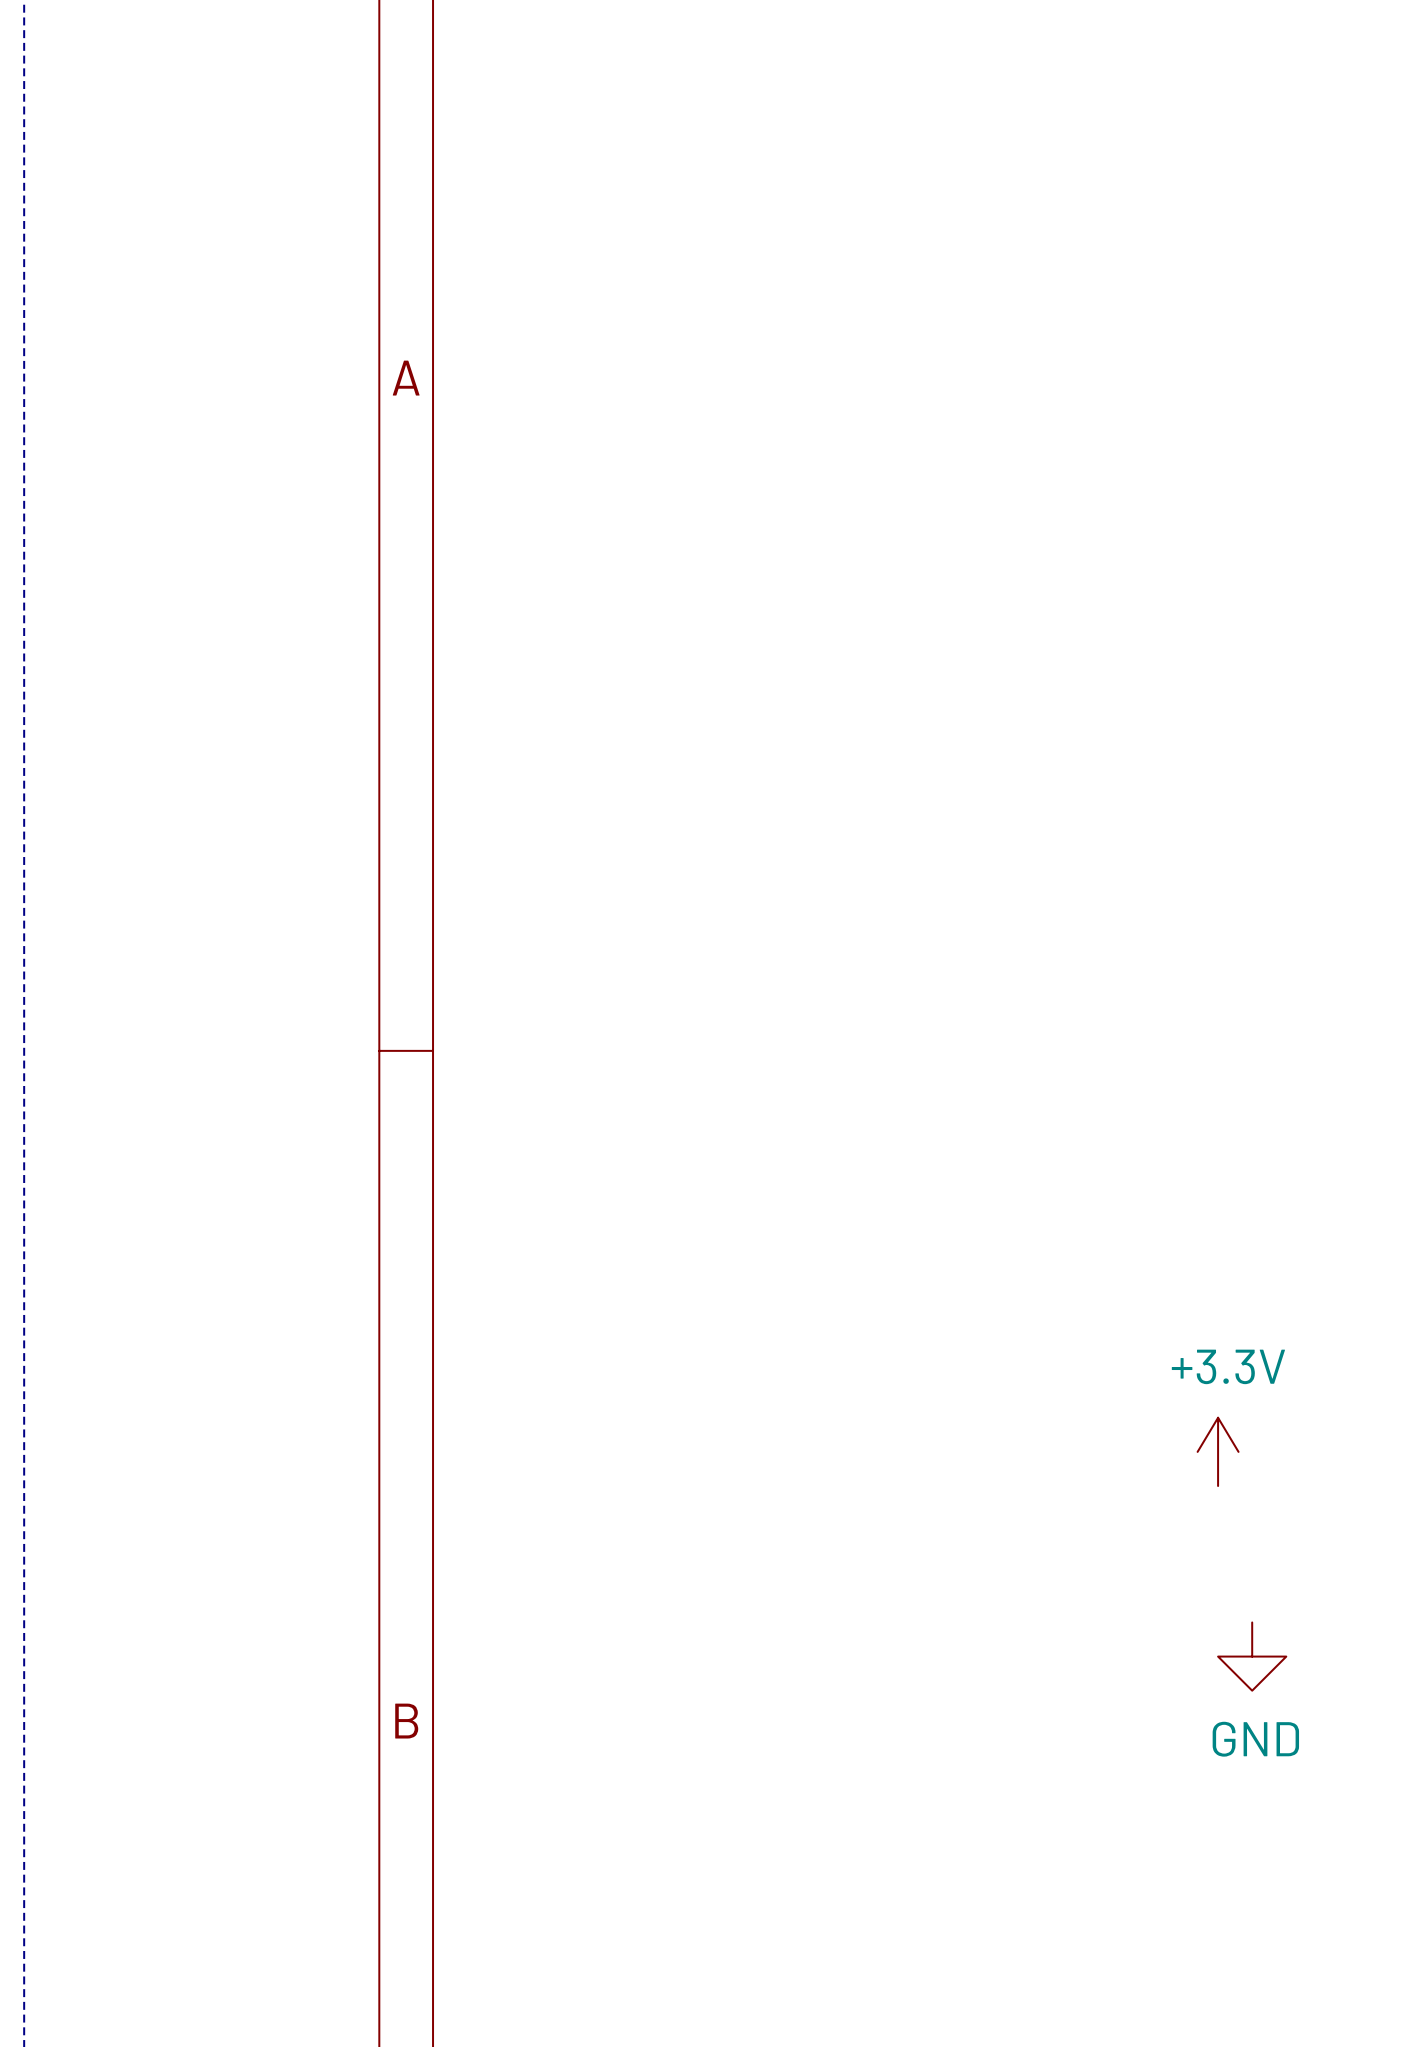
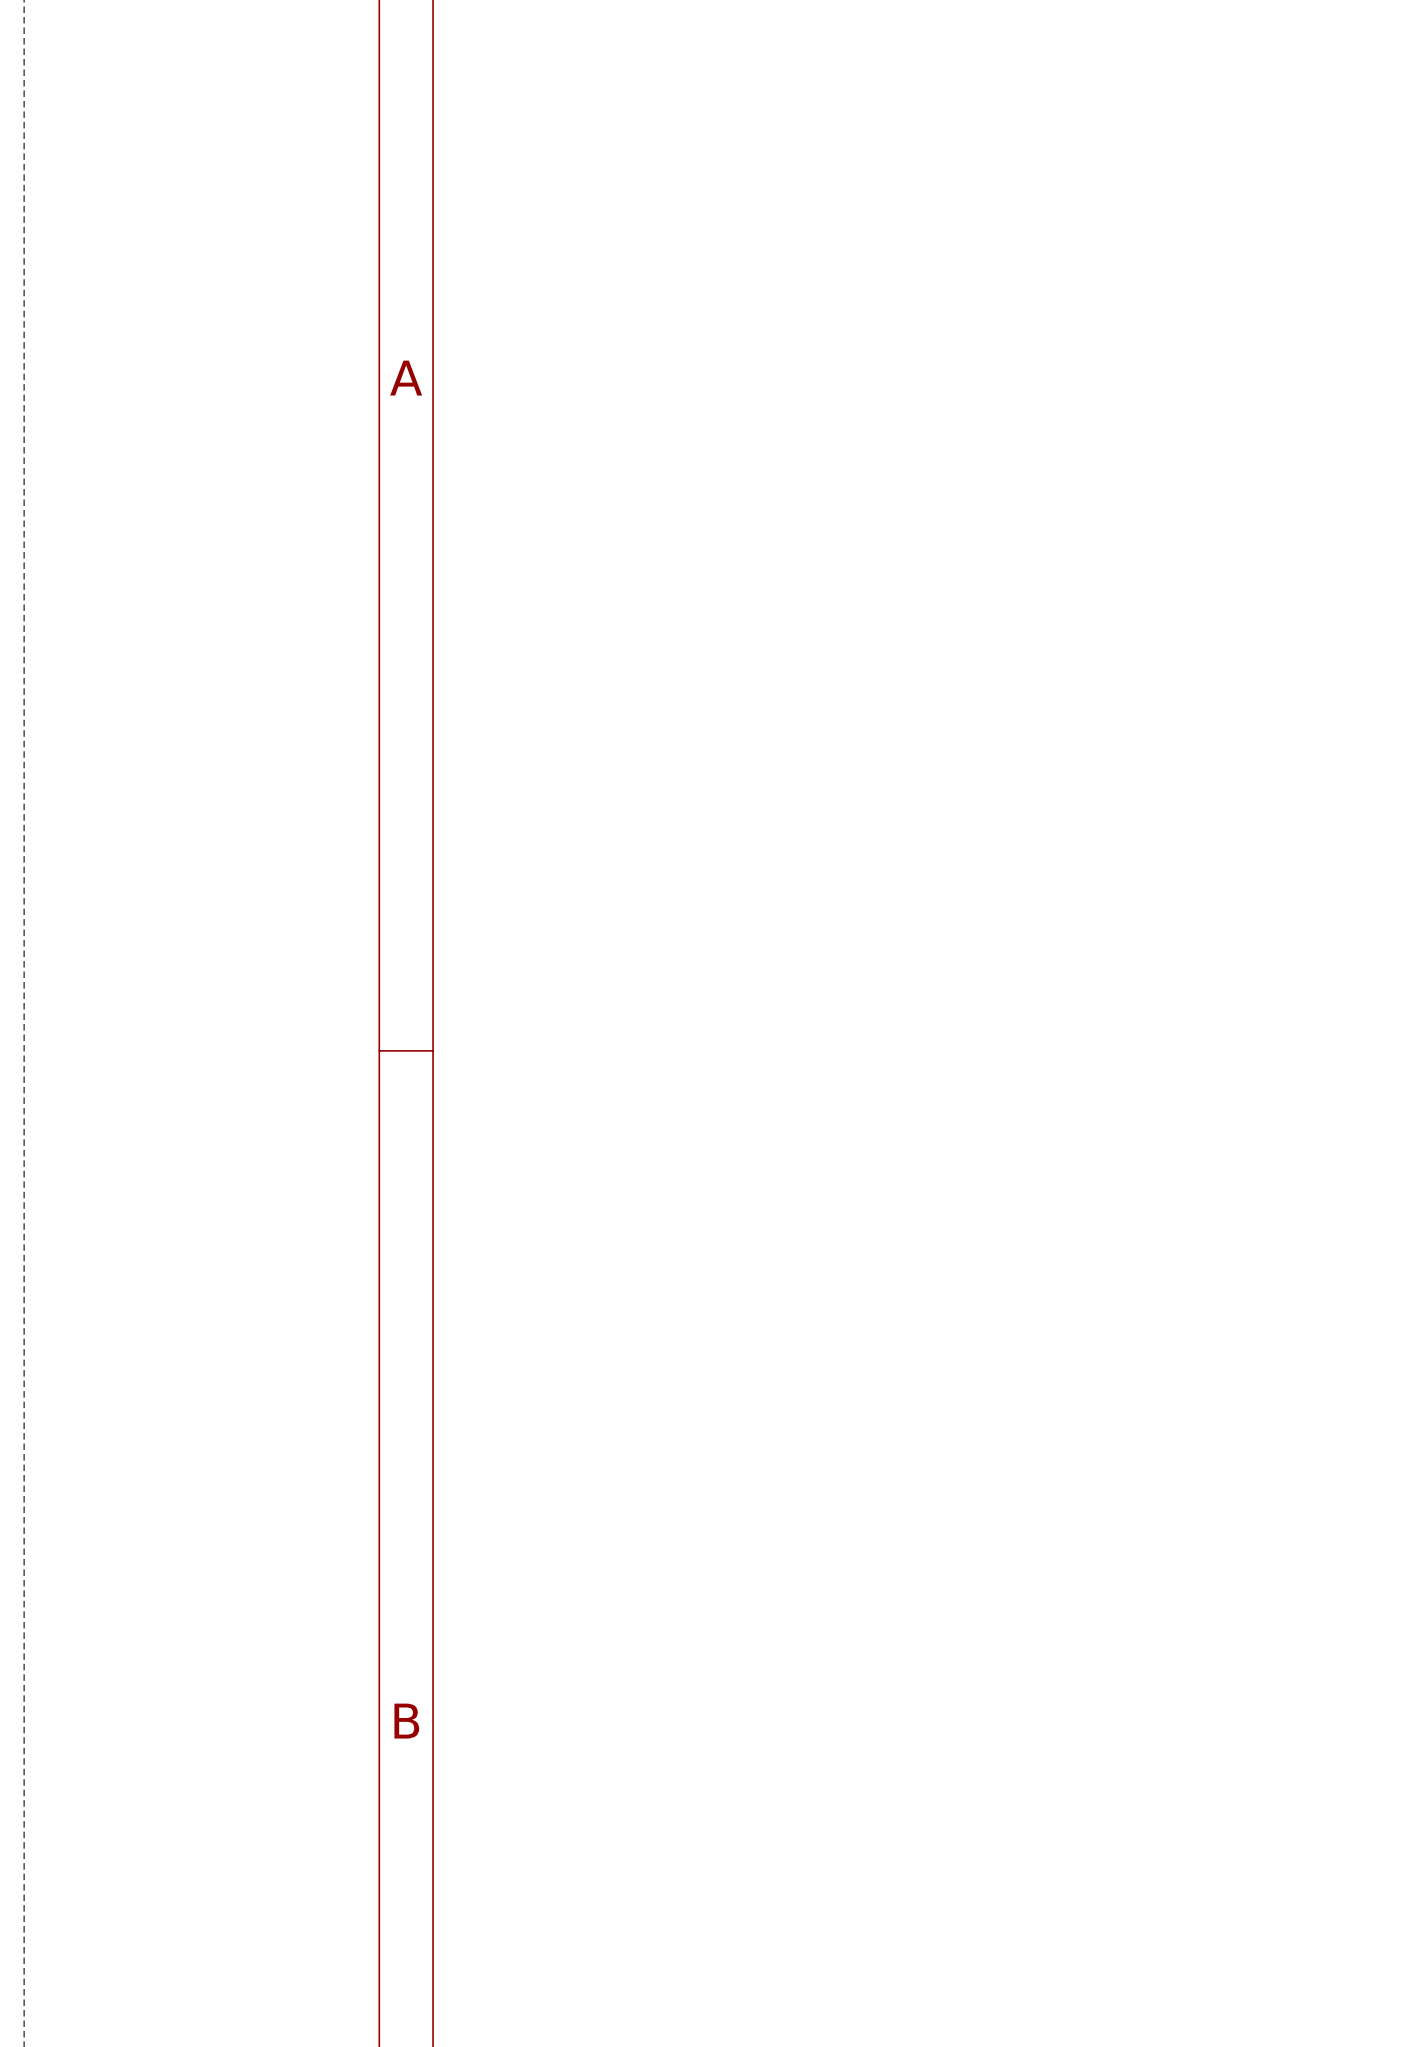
power symbol: +3.3V (1218, 1451) -> none
power symbol: GND (1252, 1656) -> none

